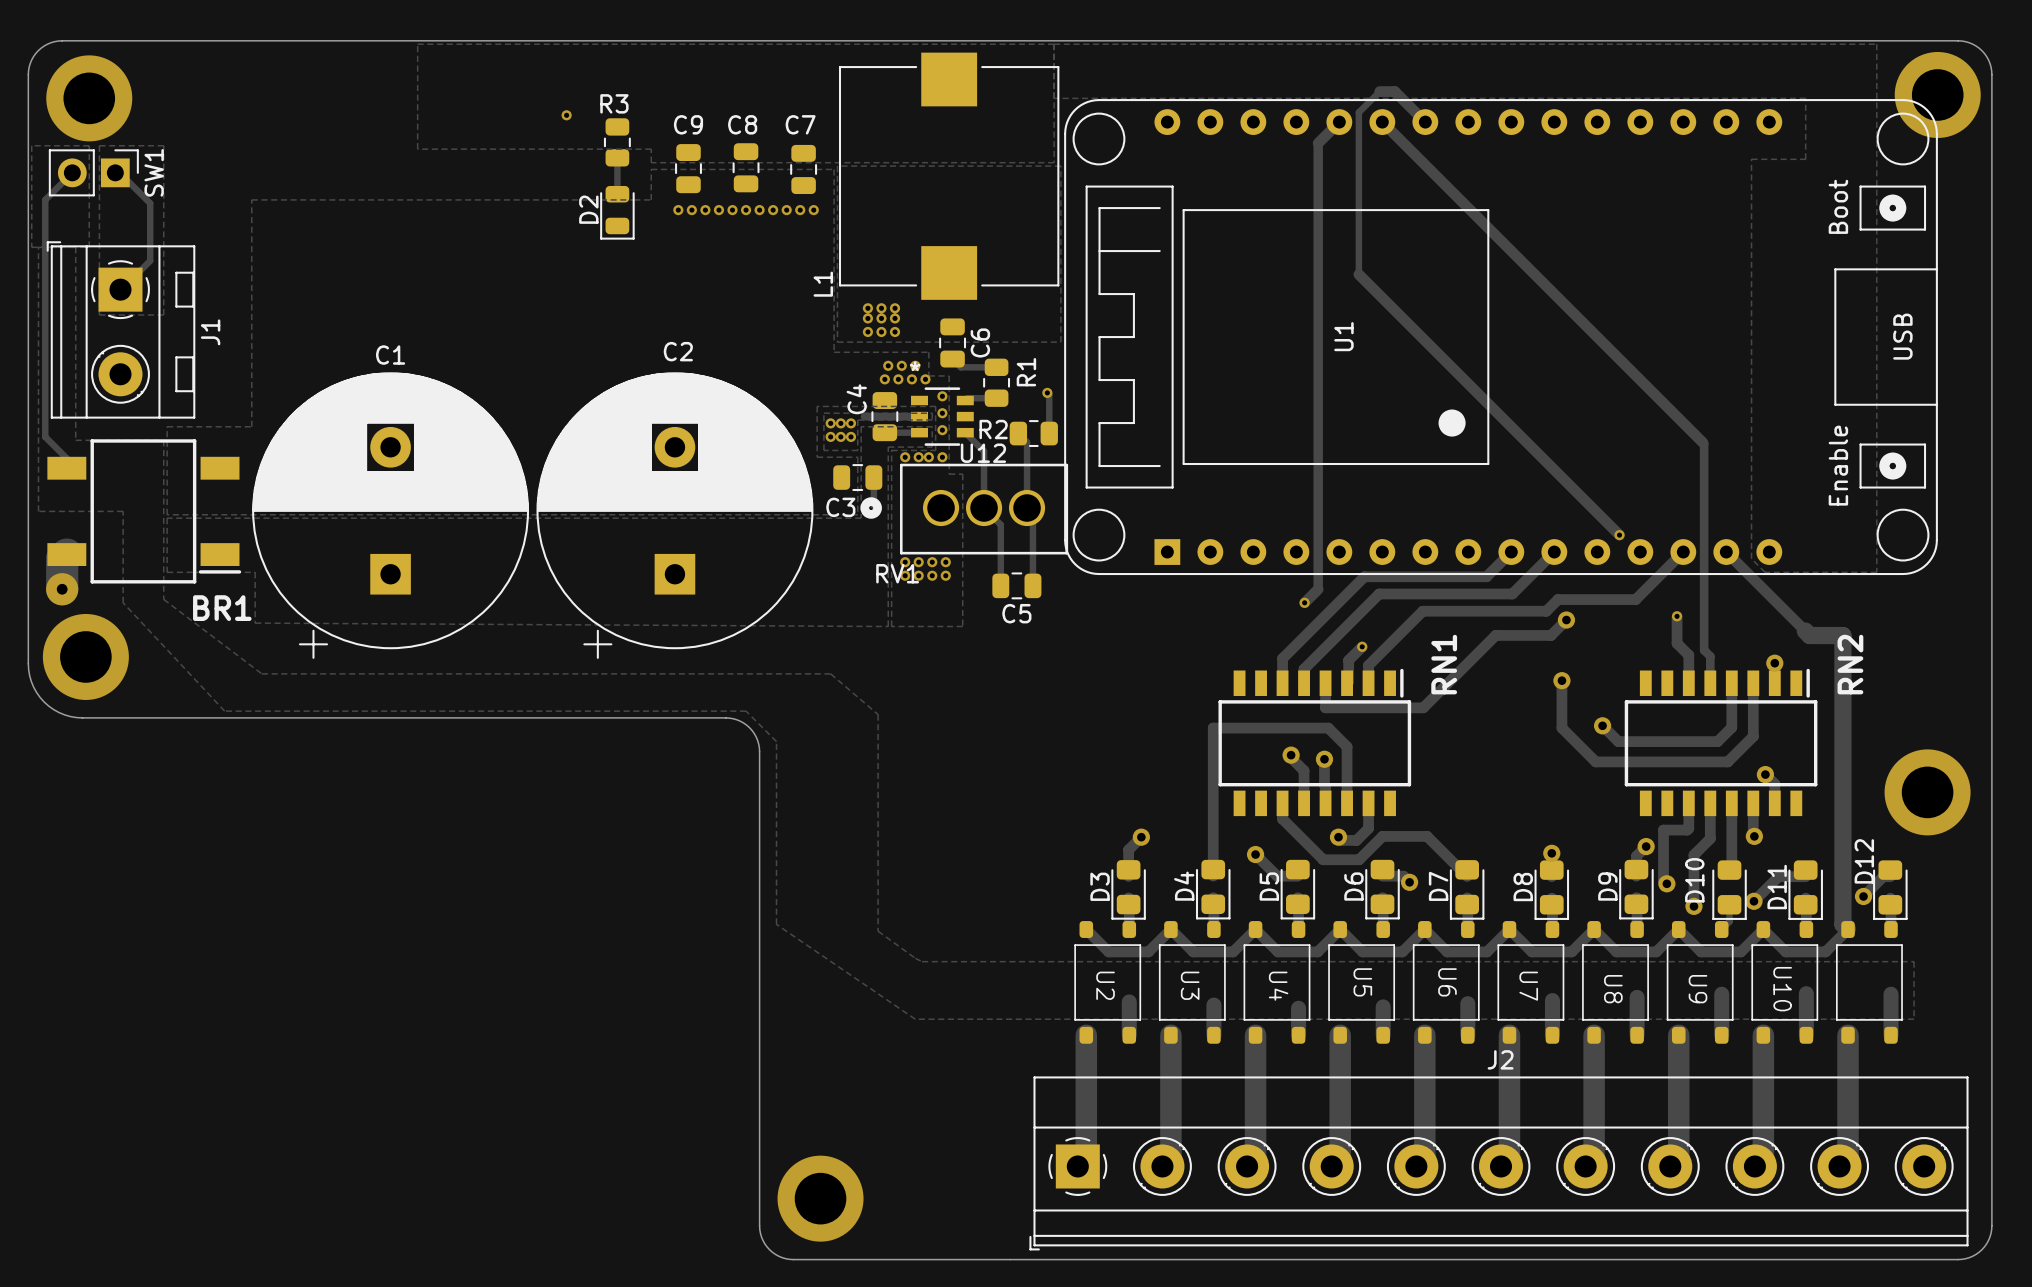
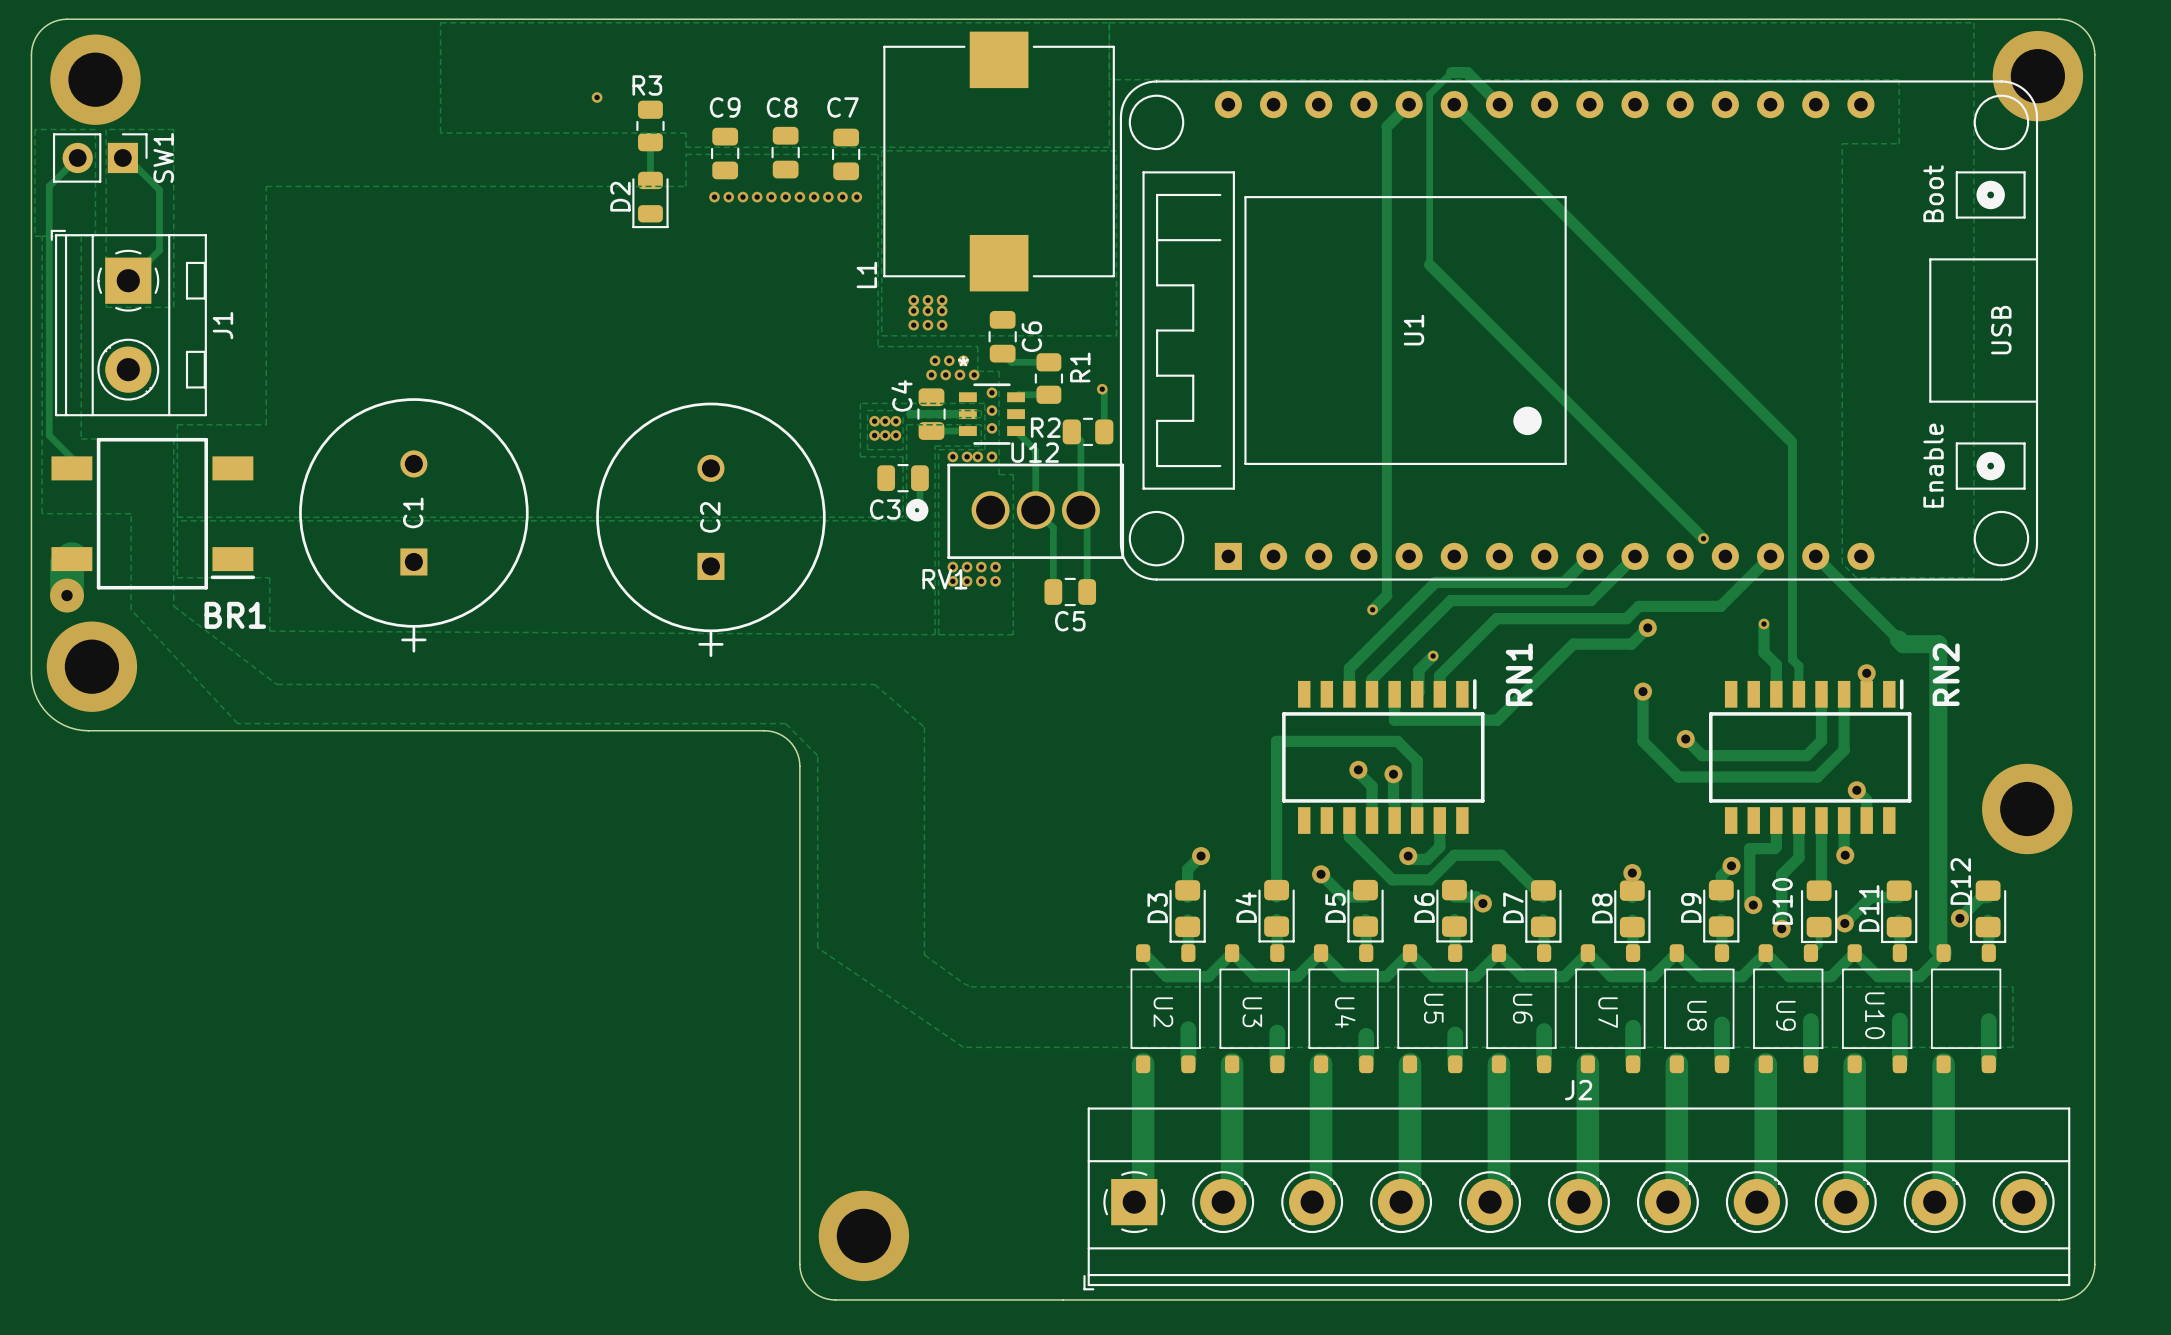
C2 name position: C2 (678, 351) -> C2 (710, 517)
C1 name position: C1 (390, 355) -> C1 (413, 512)
C1 footprint: [252, 372, 530, 659] -> [299, 398, 529, 653]
C2 footprint: [536, 372, 814, 659] -> [596, 402, 826, 658]

